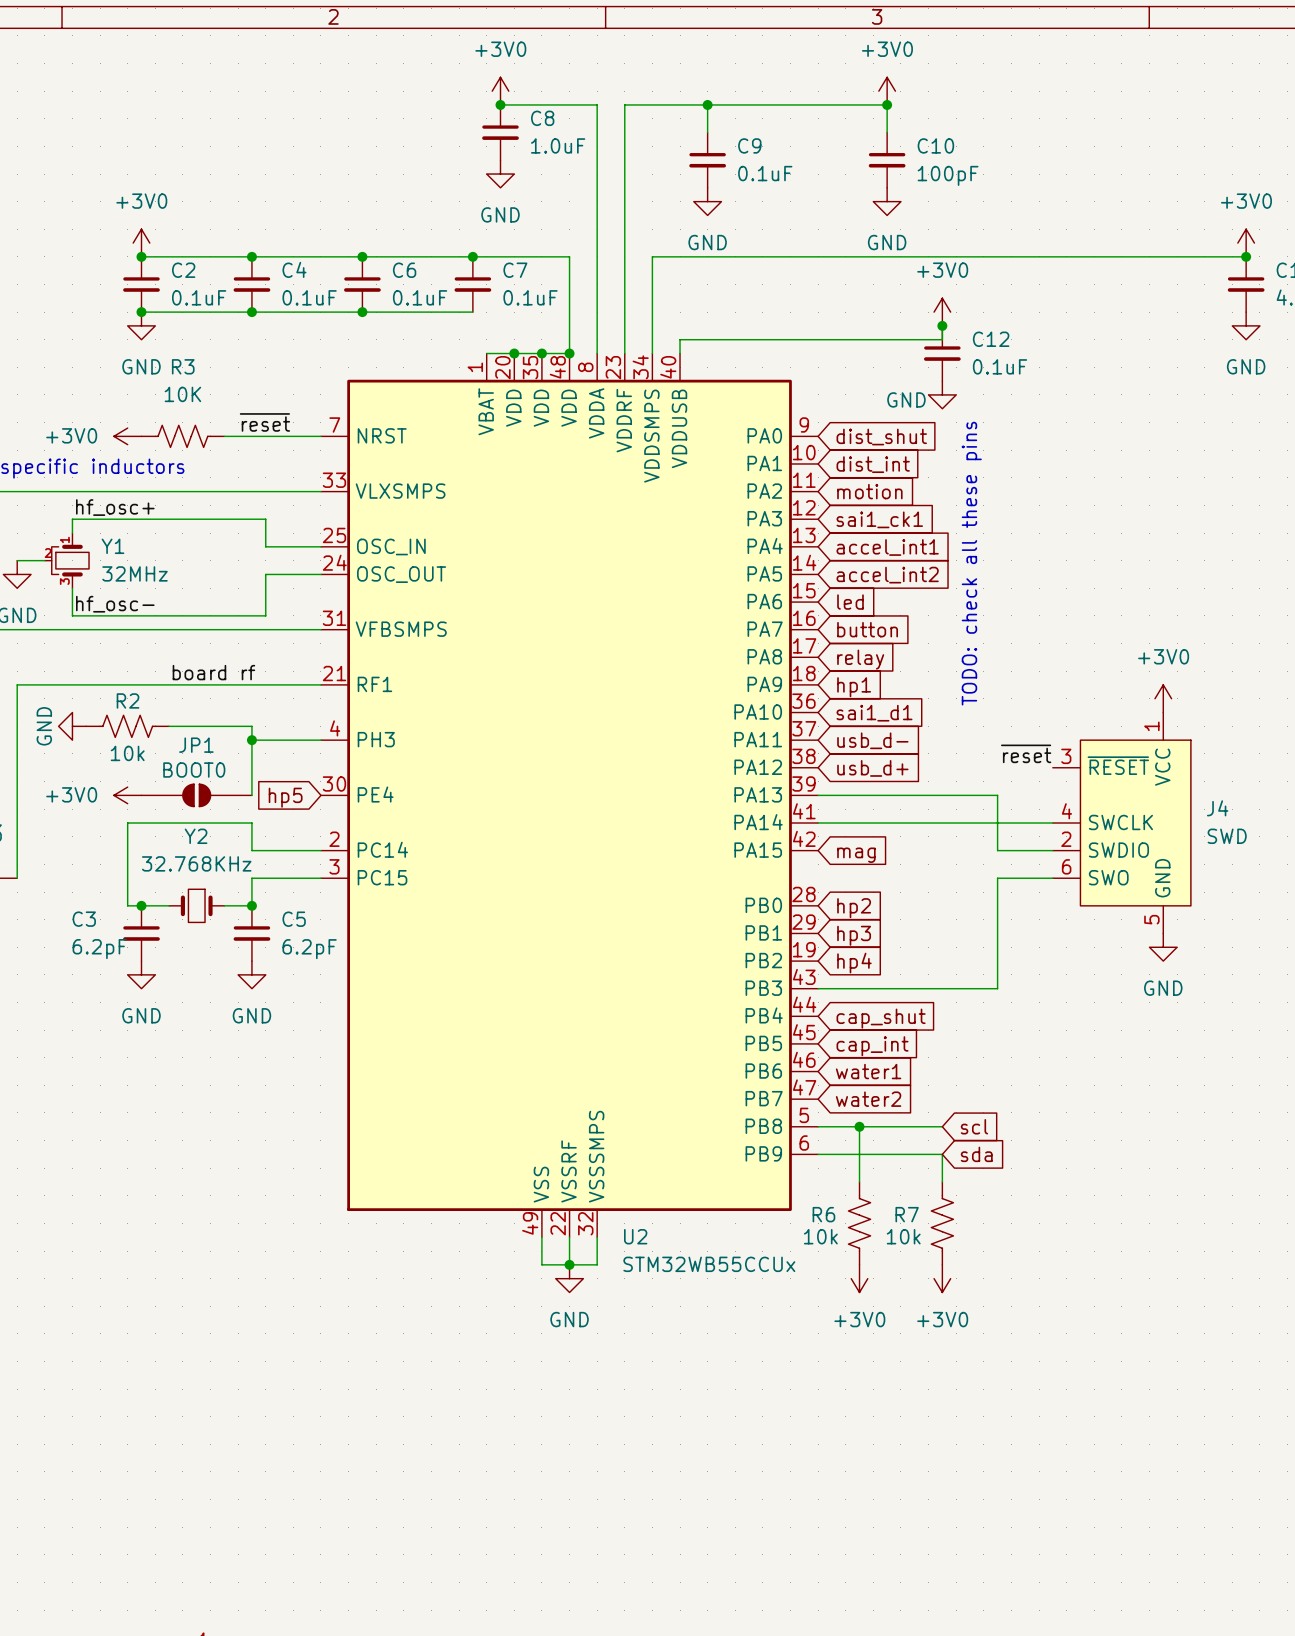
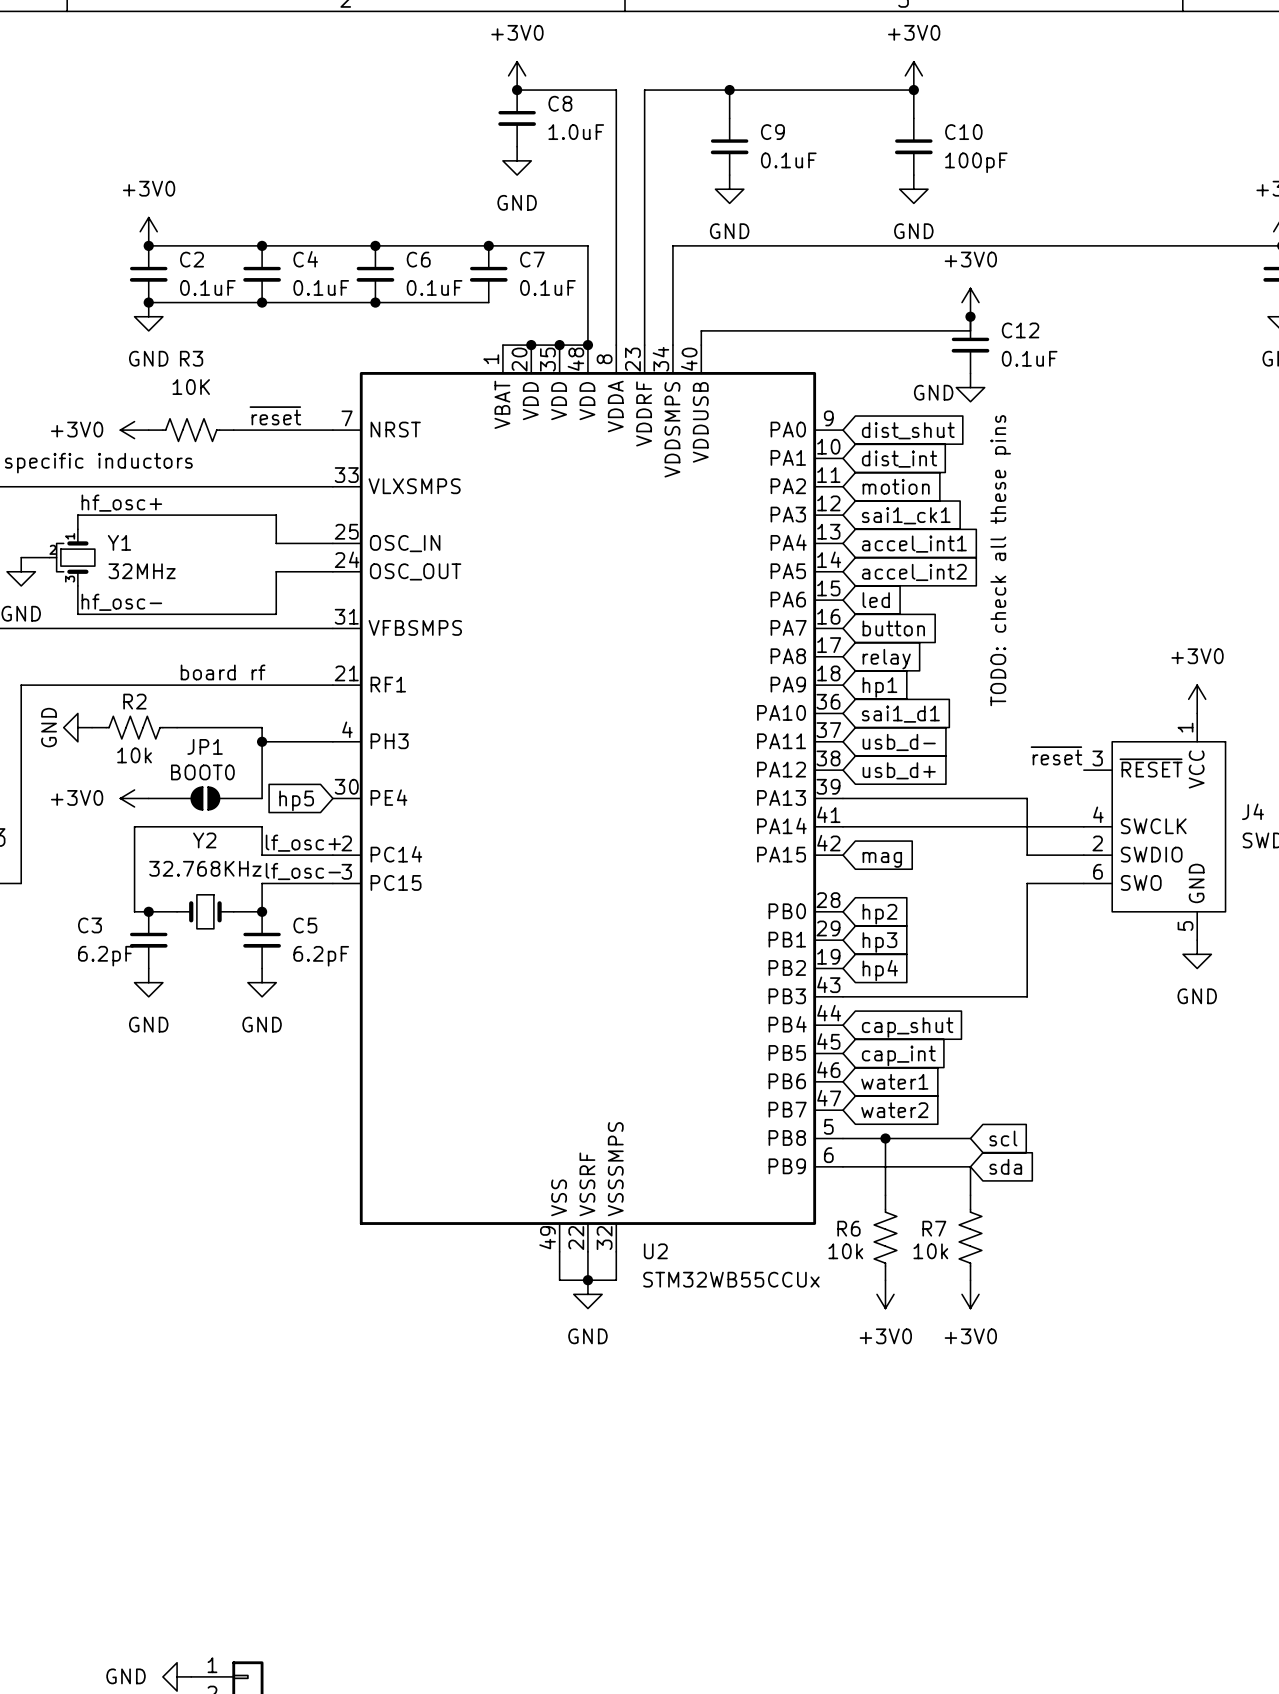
label: none -> lf_osc+ (303, 843)
label: none -> lf_osc- (303, 871)

